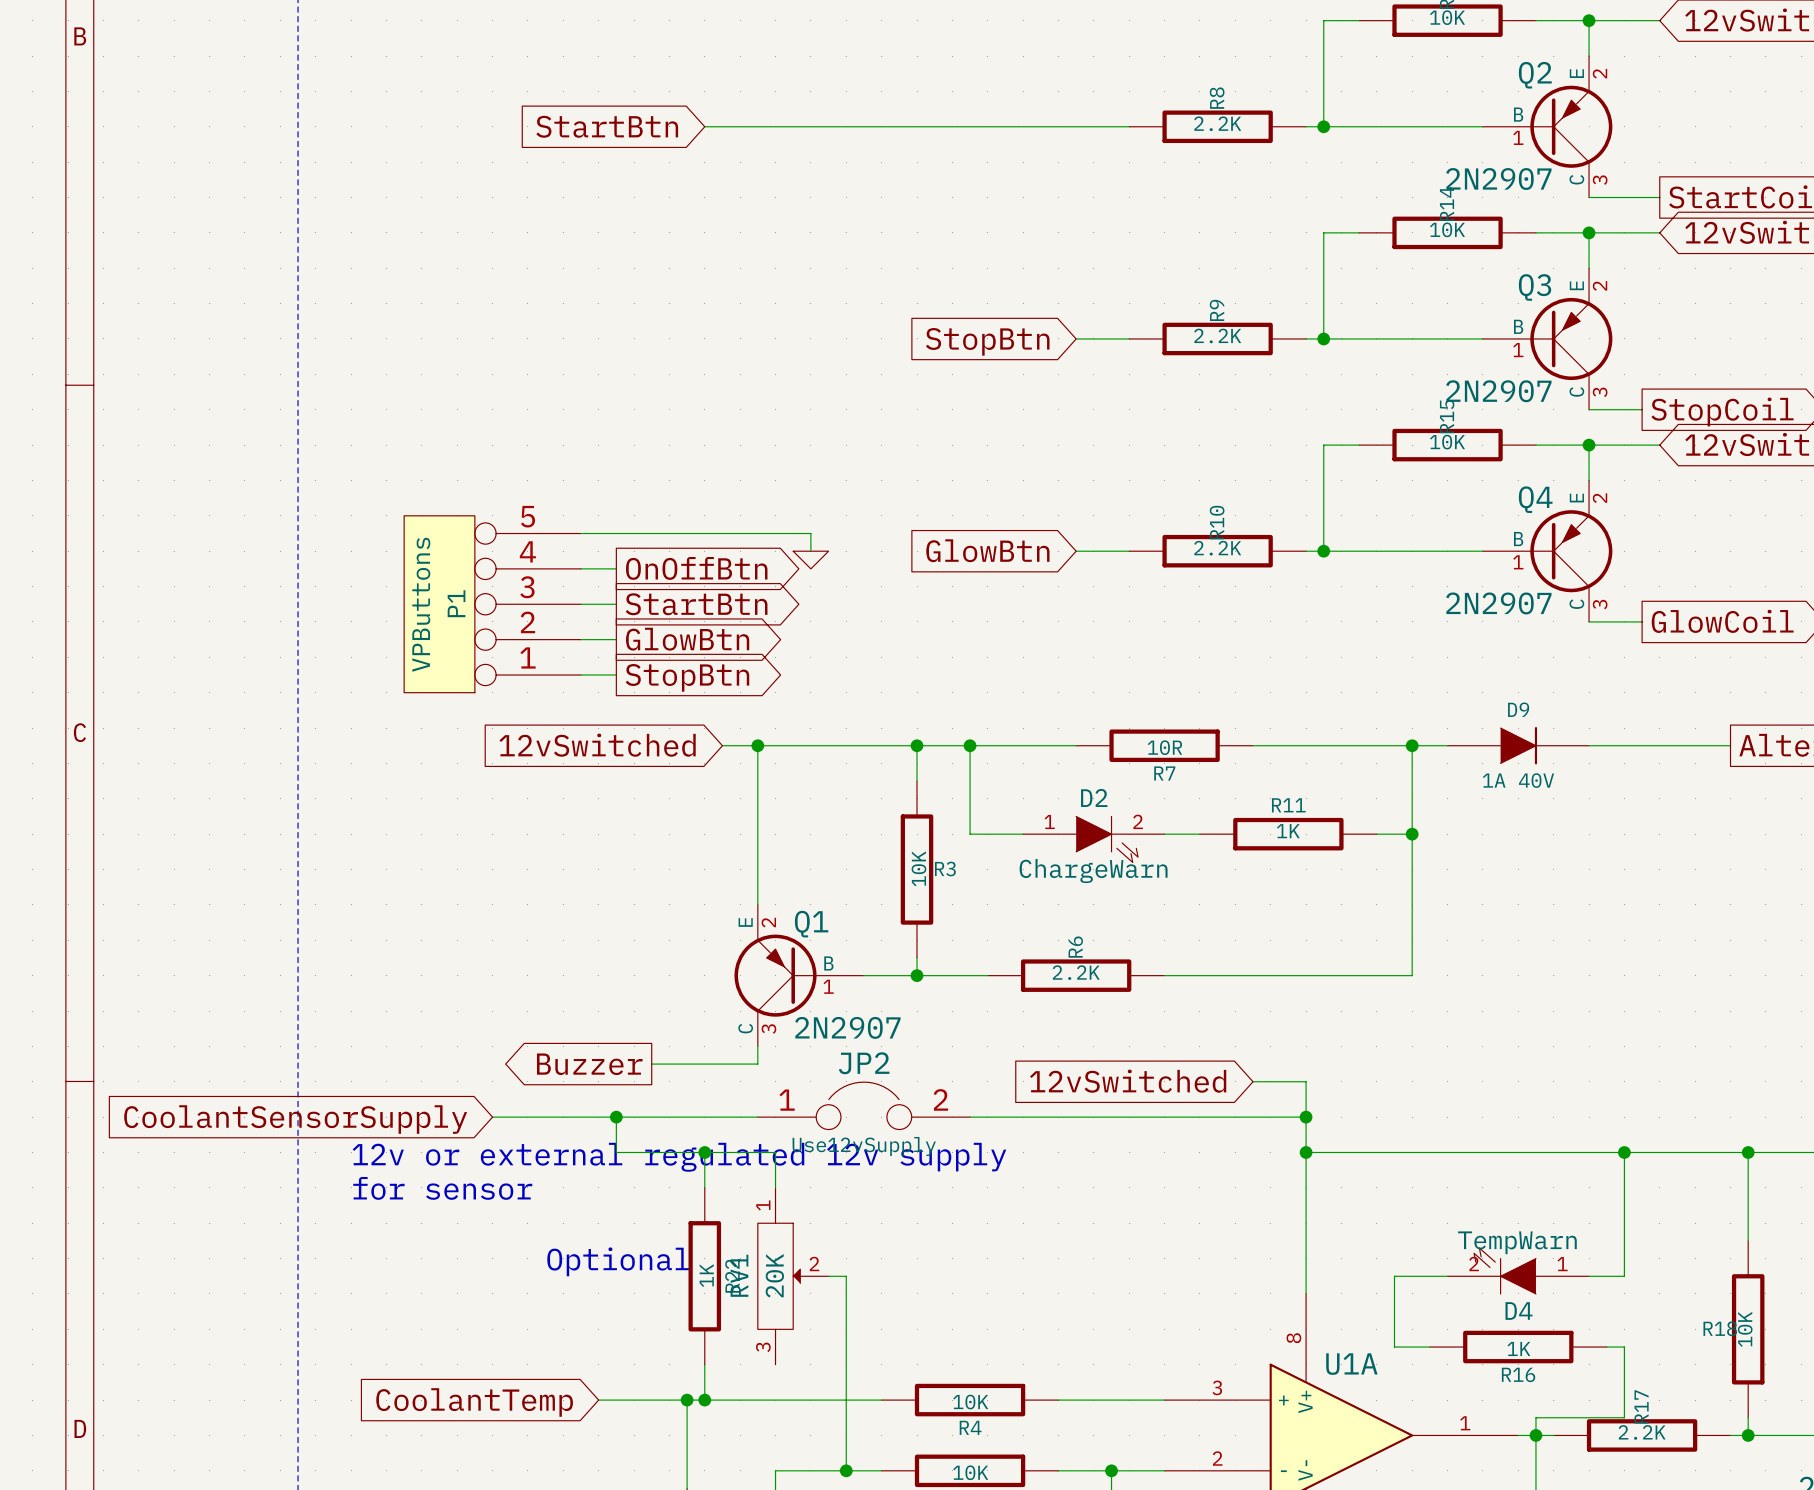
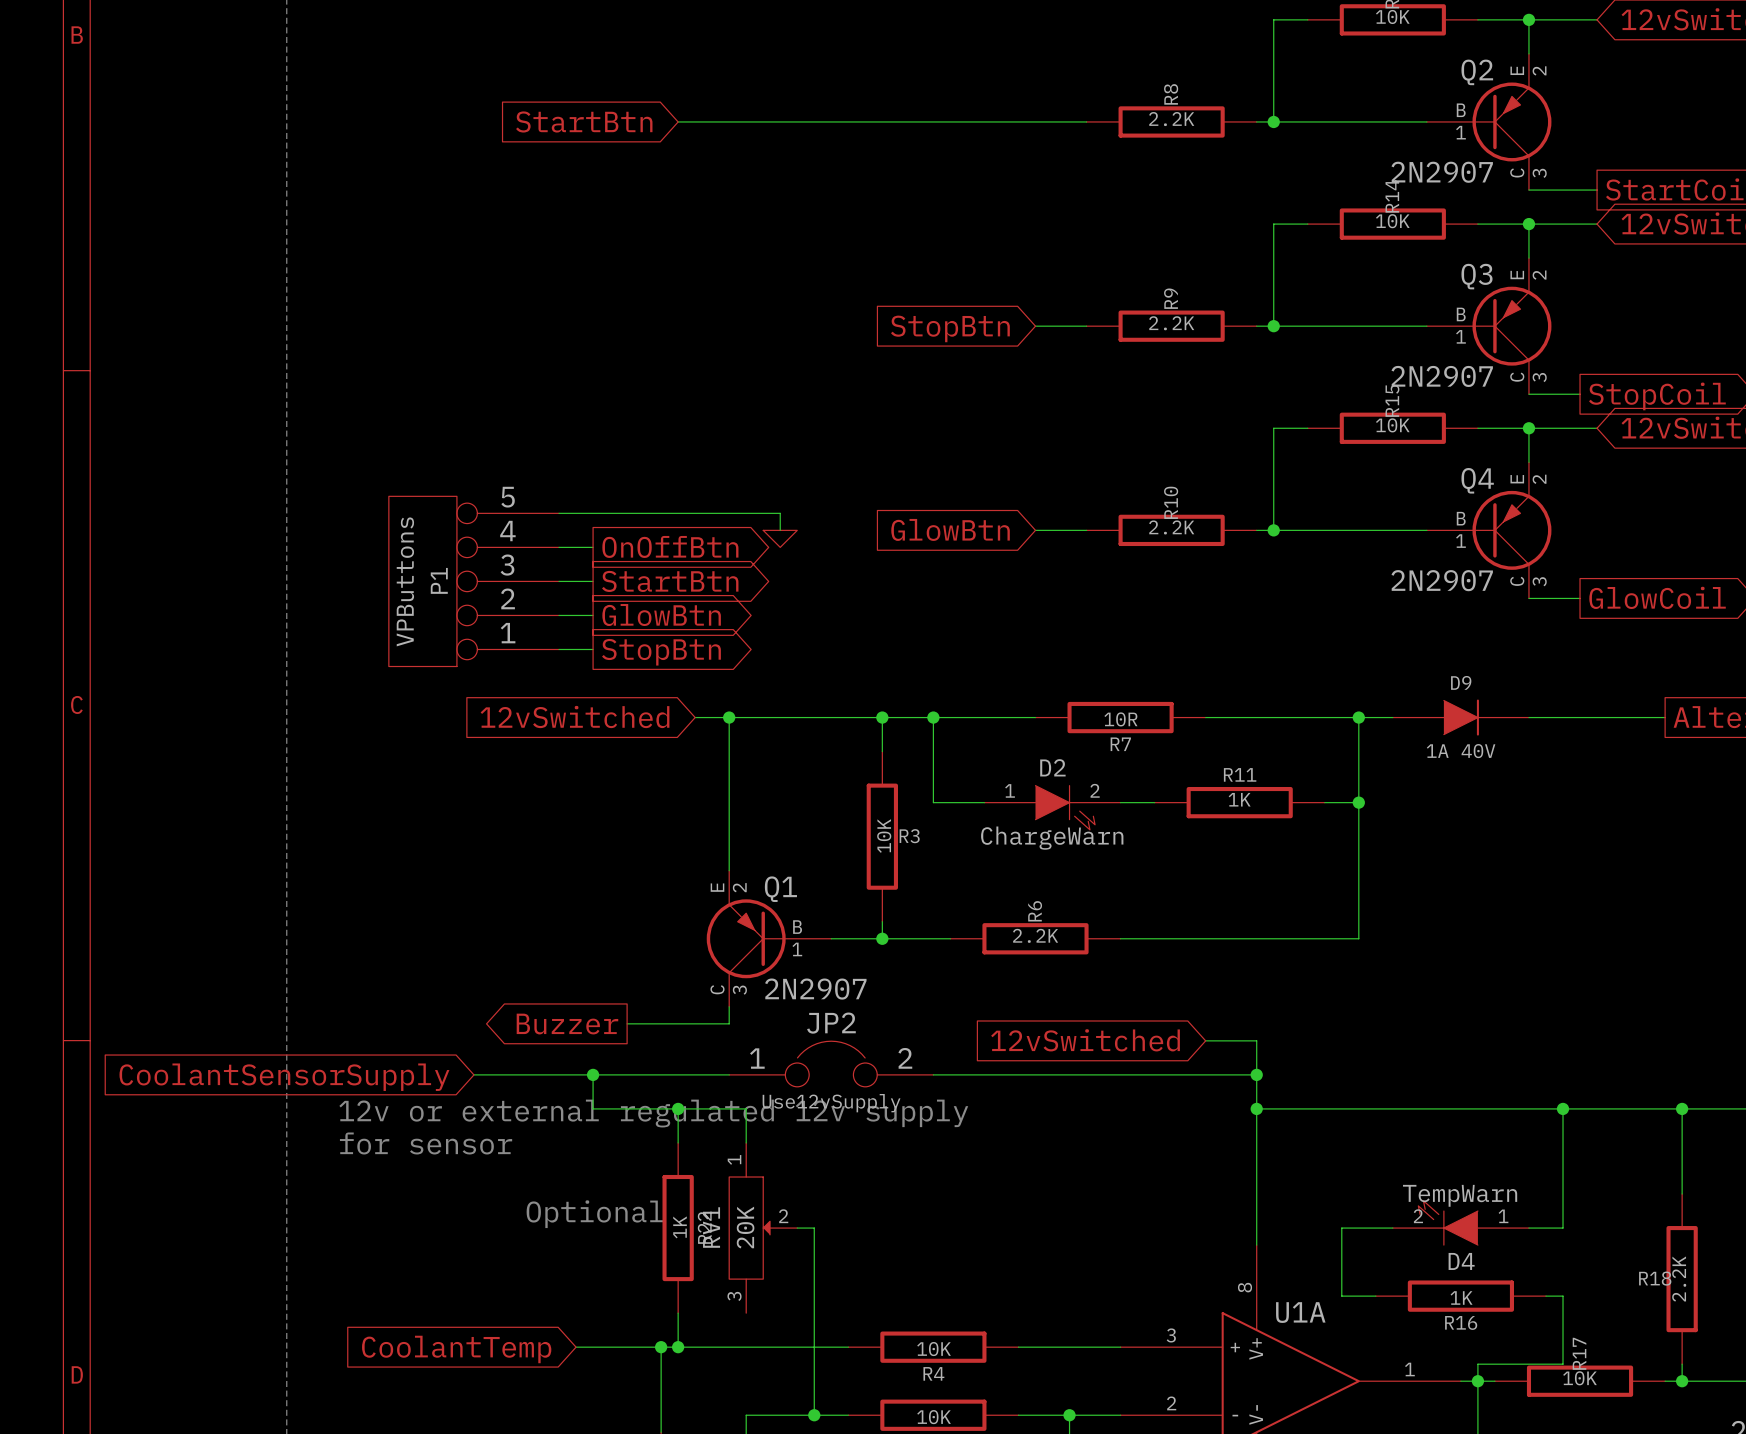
R18 value: 10K (1745, 1329) -> 2.2K (1679, 1279)
R17 value: 2.2K (1642, 1432) -> 10K (1579, 1378)

